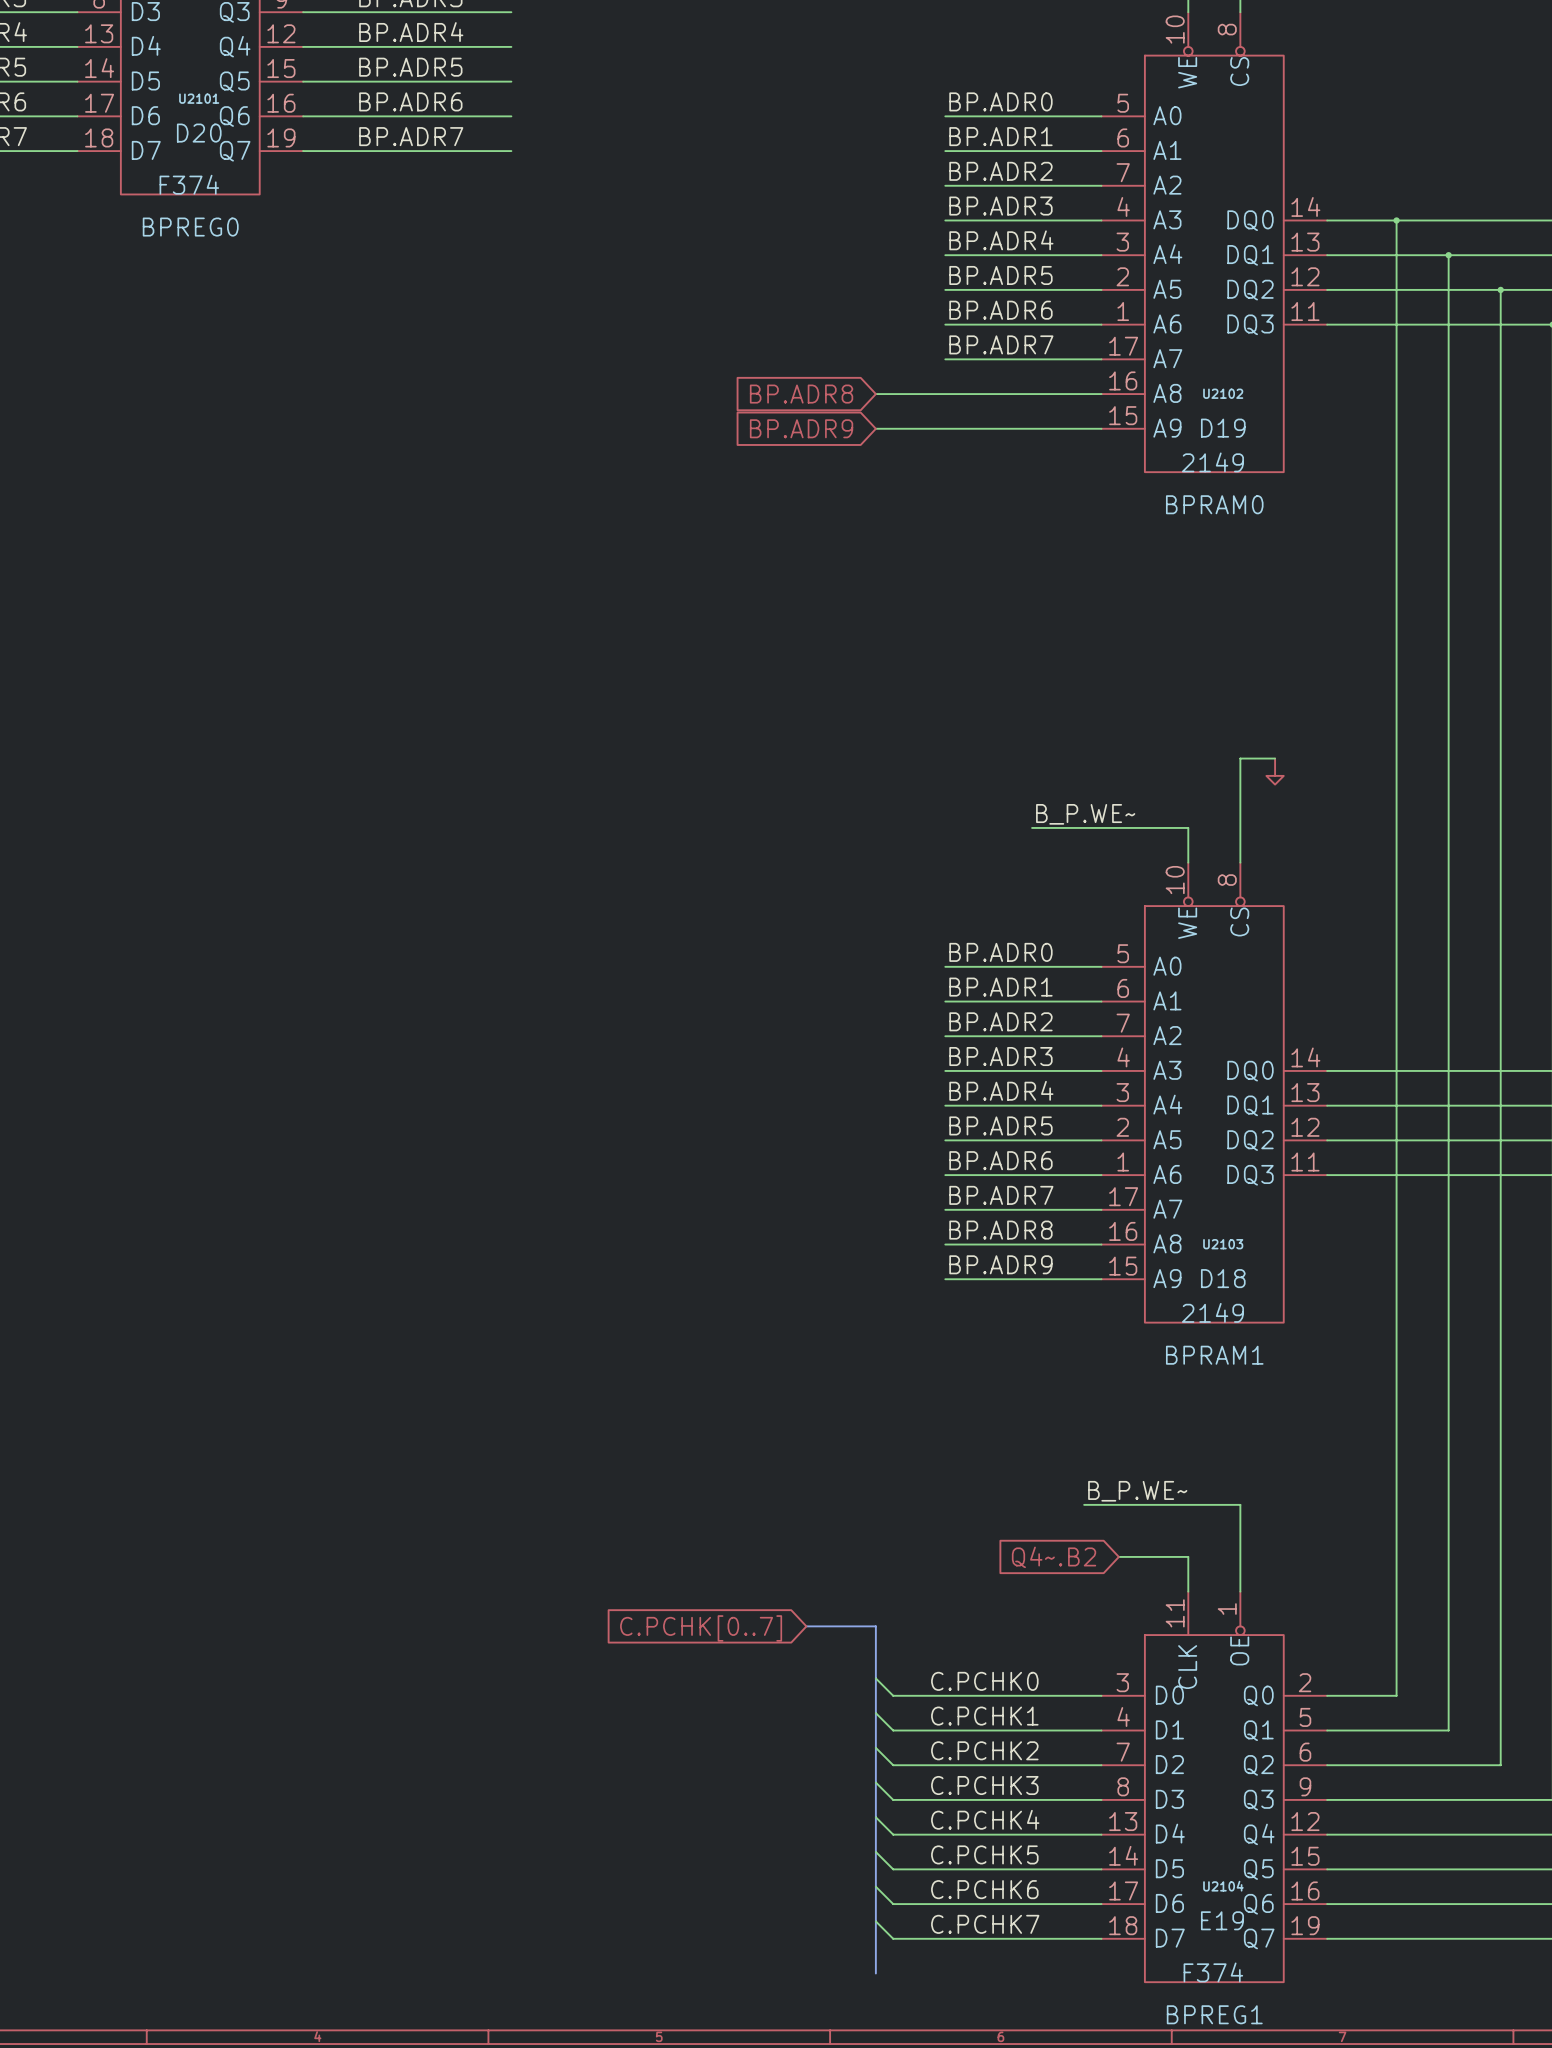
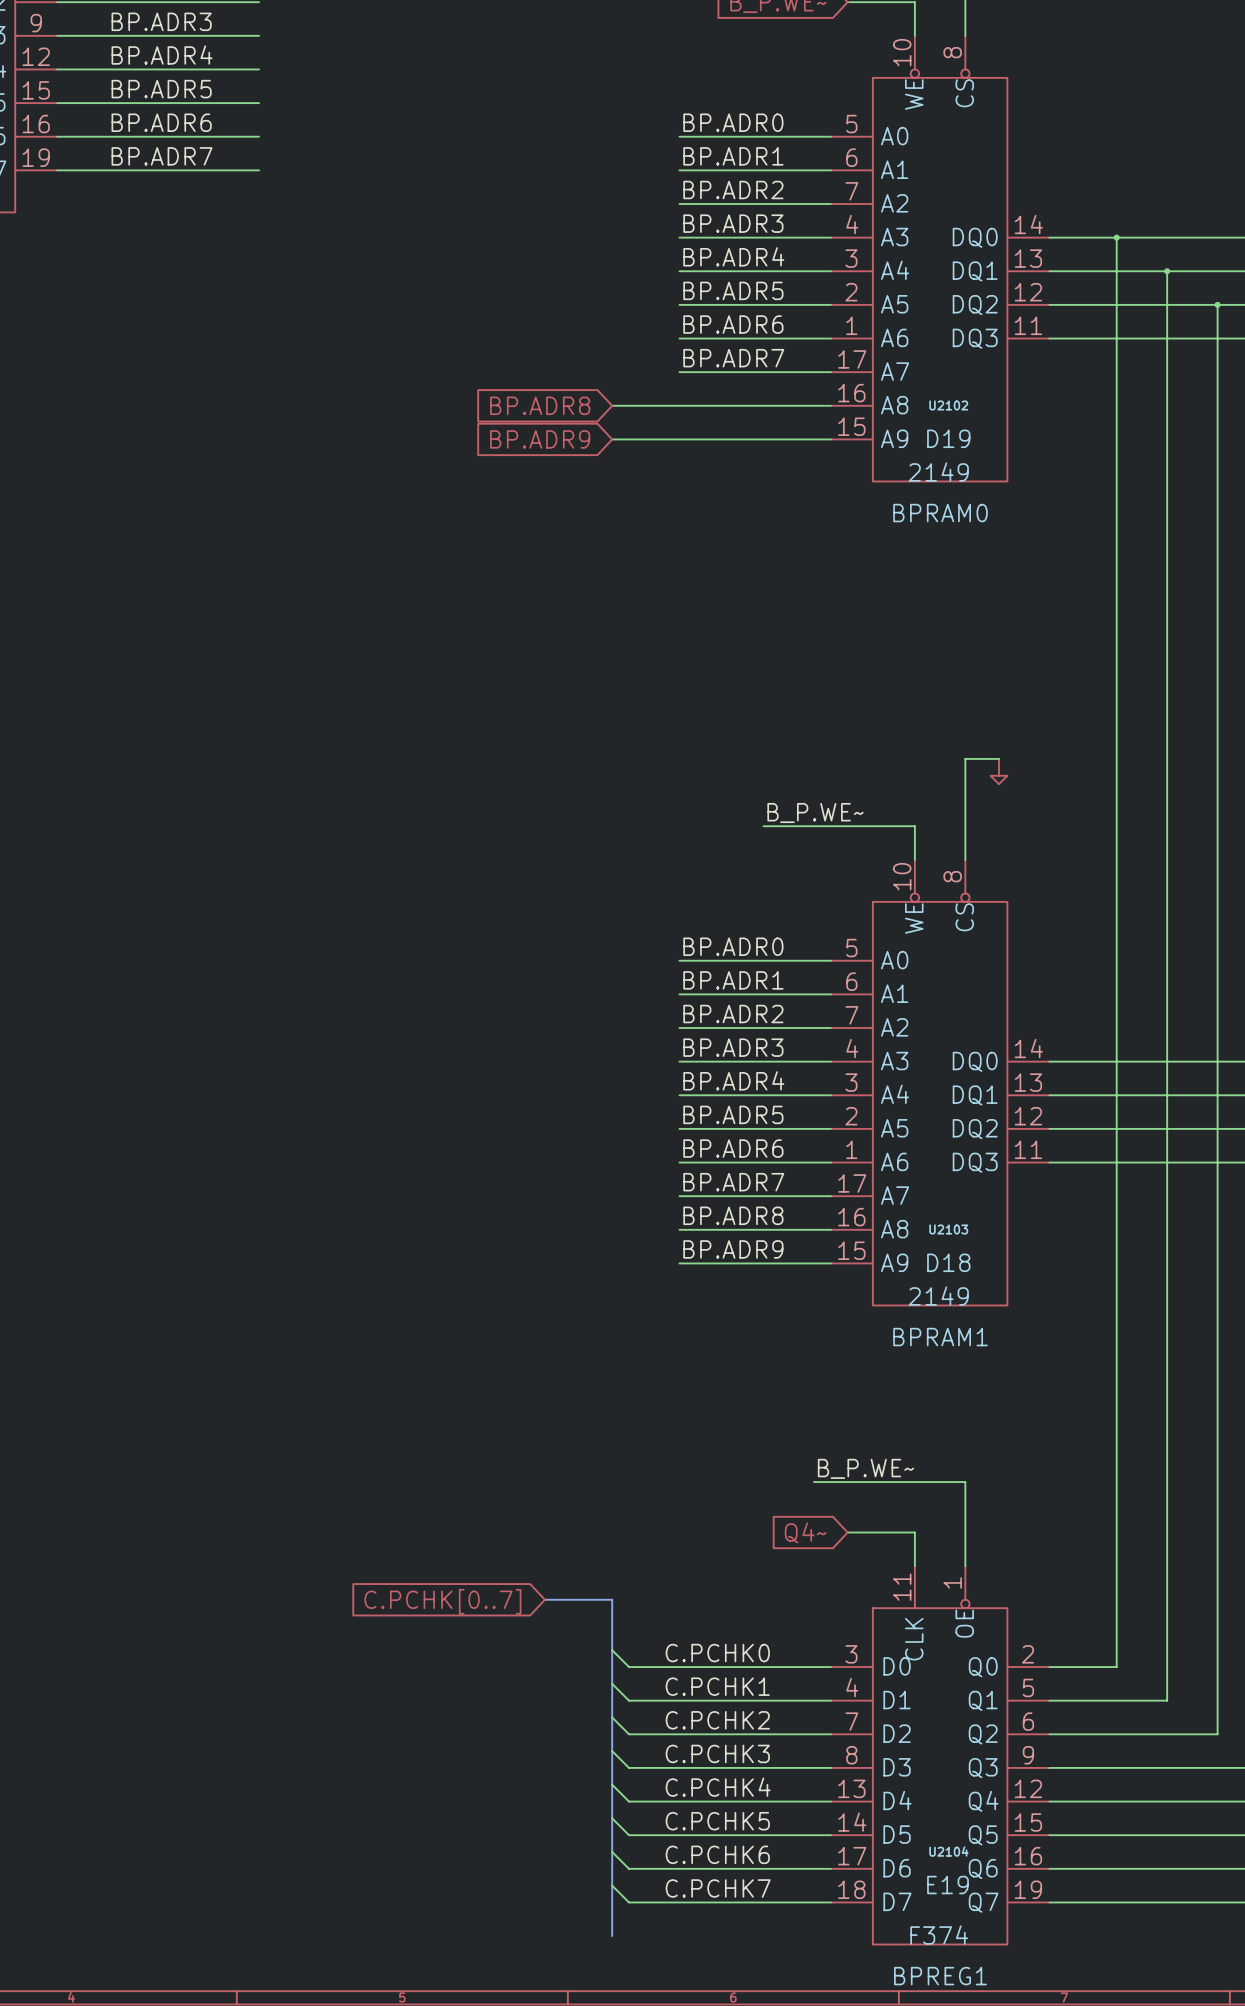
global label: Q4~.B2 (1054, 1557) -> Q4~ (805, 1532)

